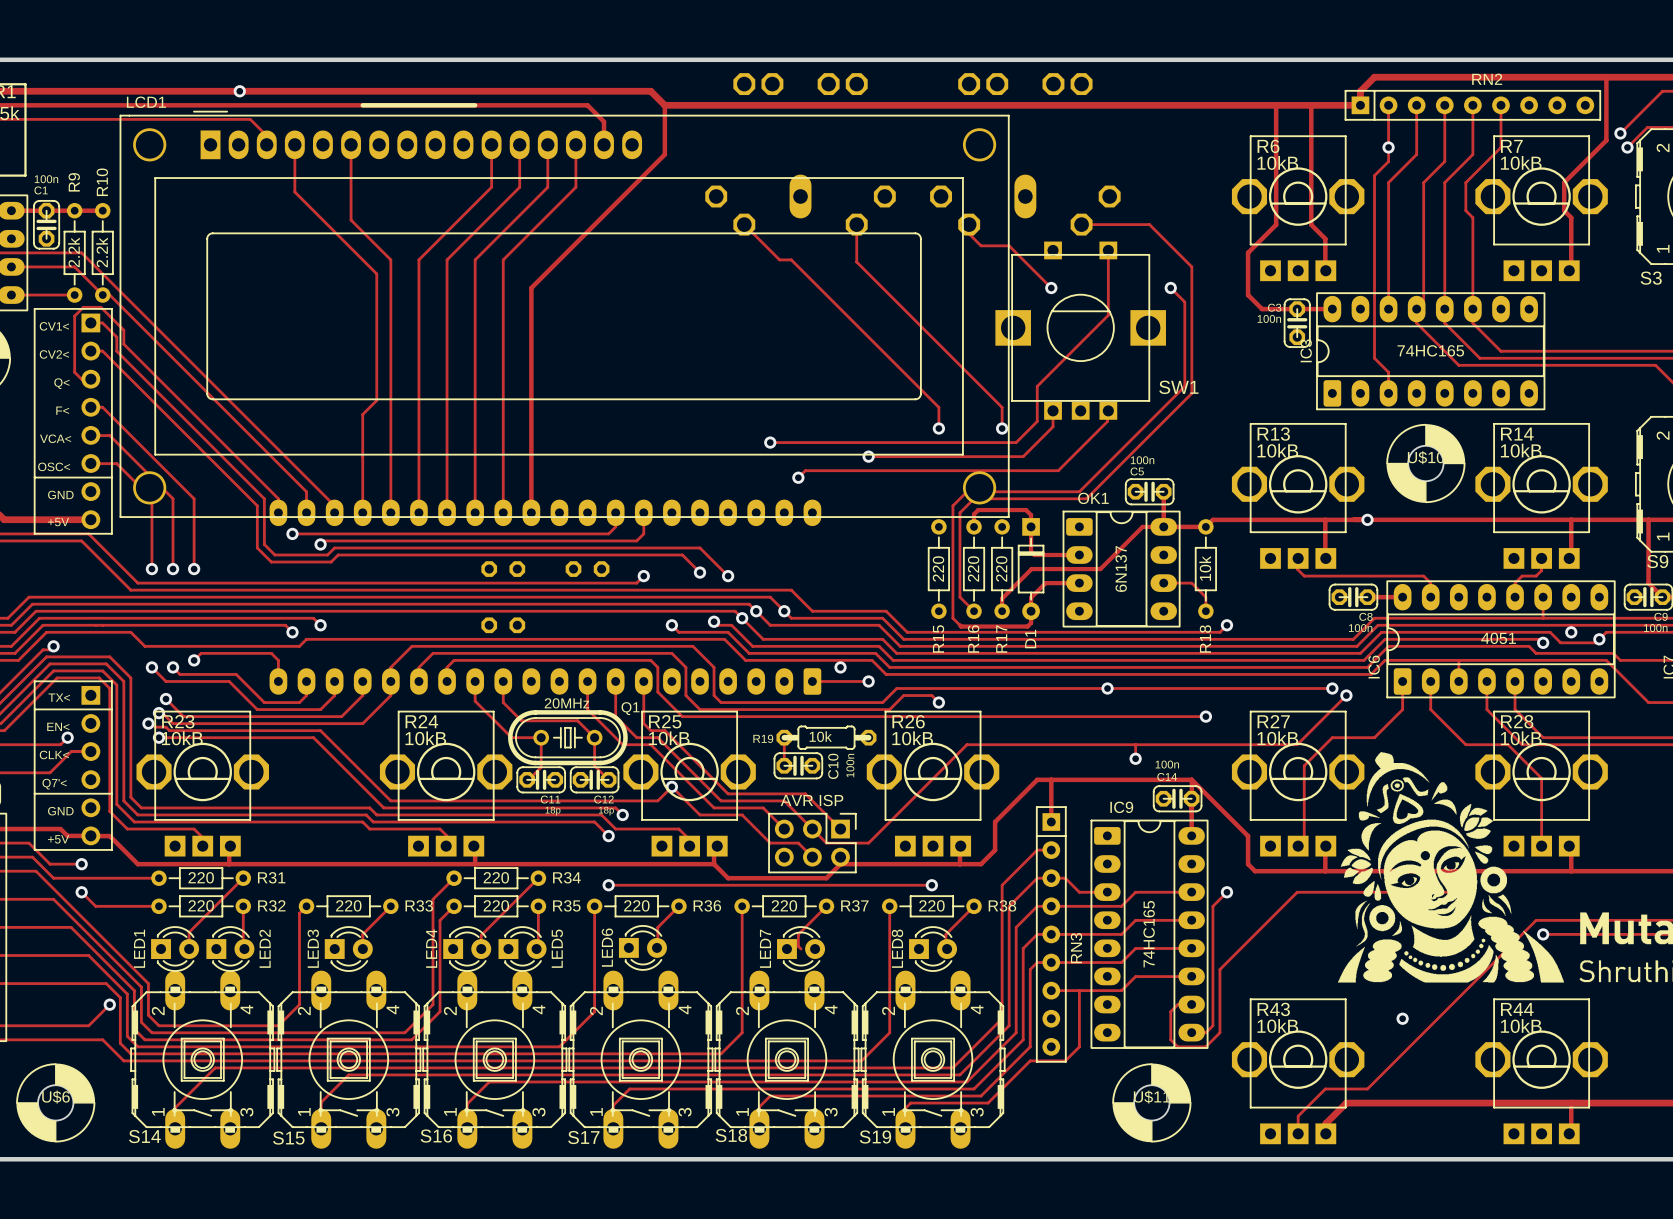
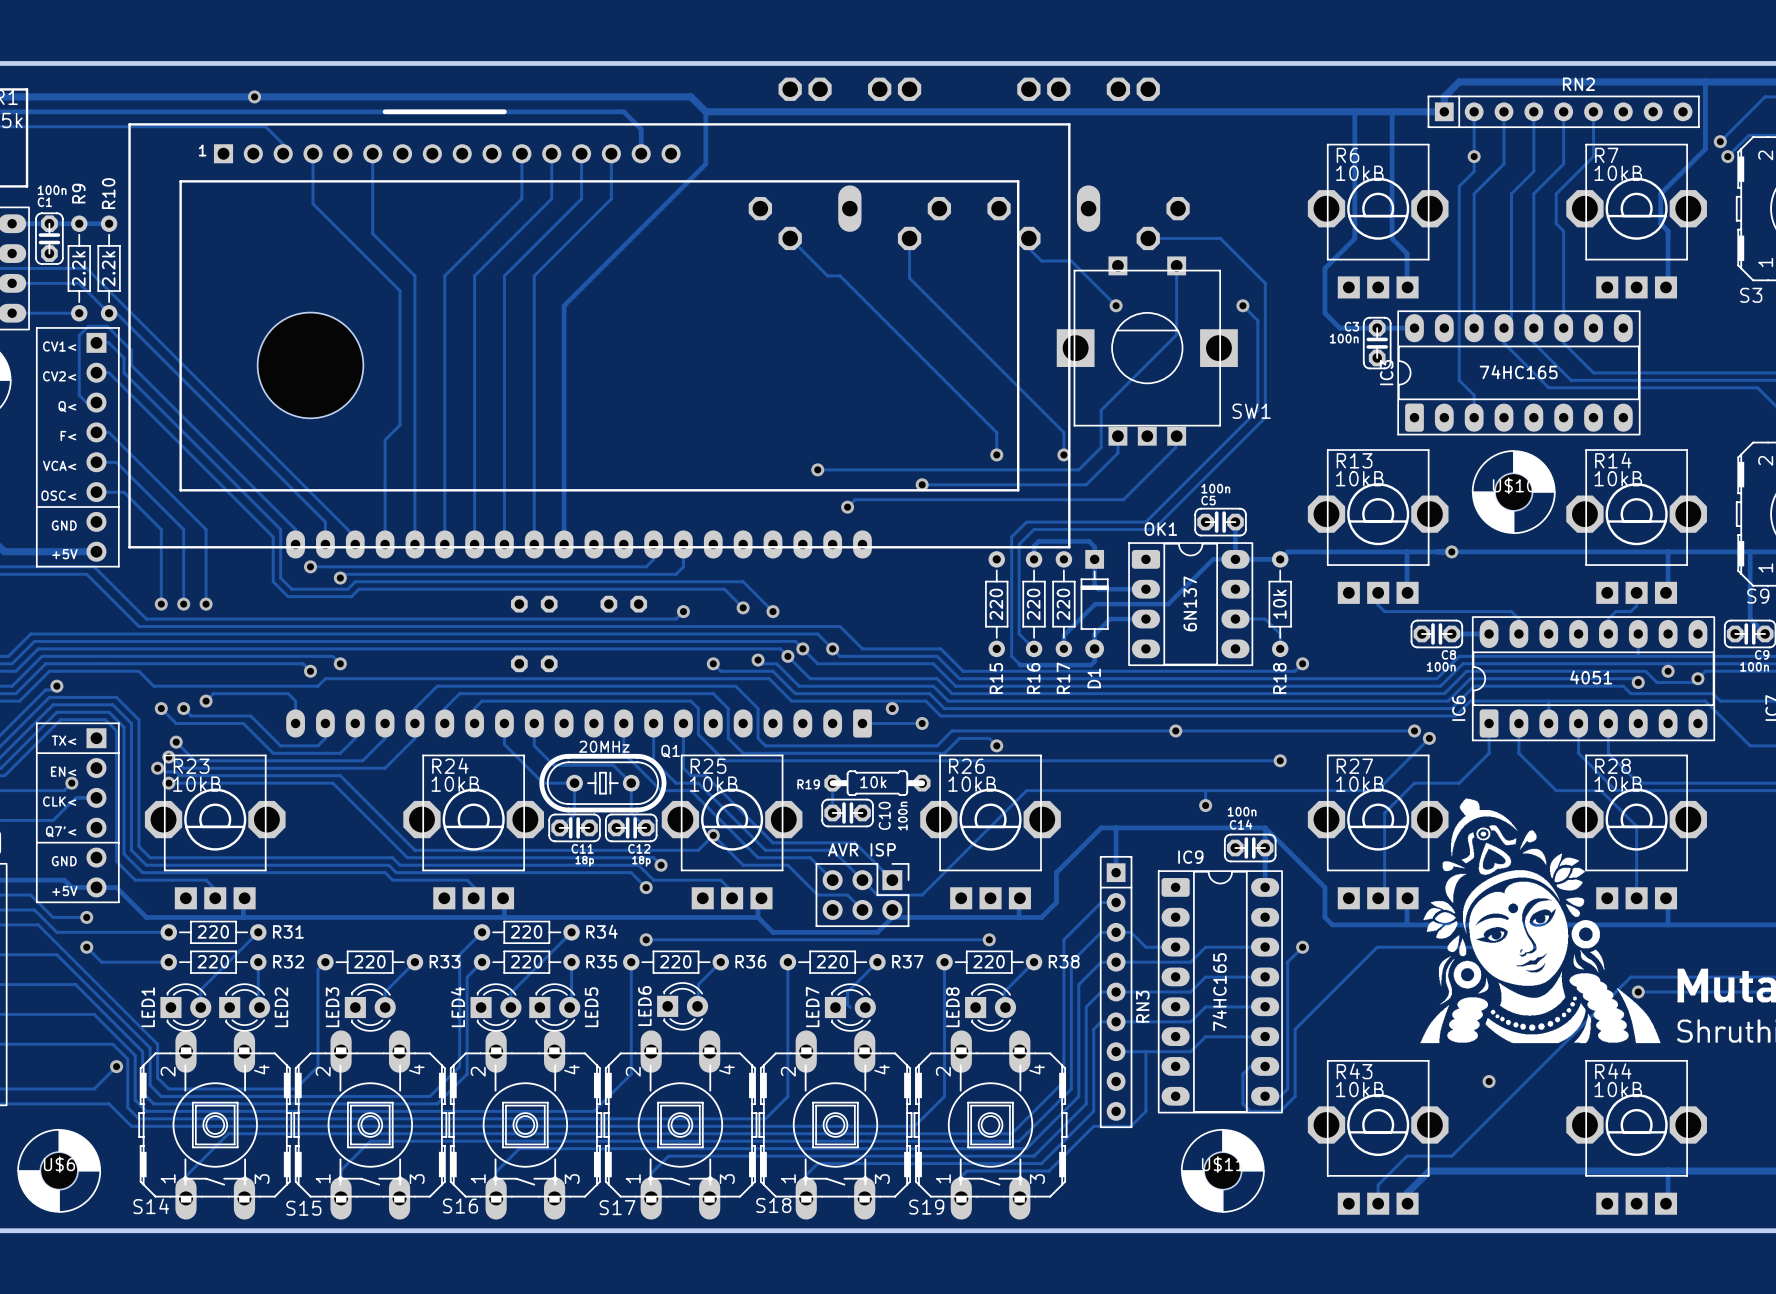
LCD1: (564, 314) -> none
part: none -> (599, 335)
part: none -> (310, 365)

